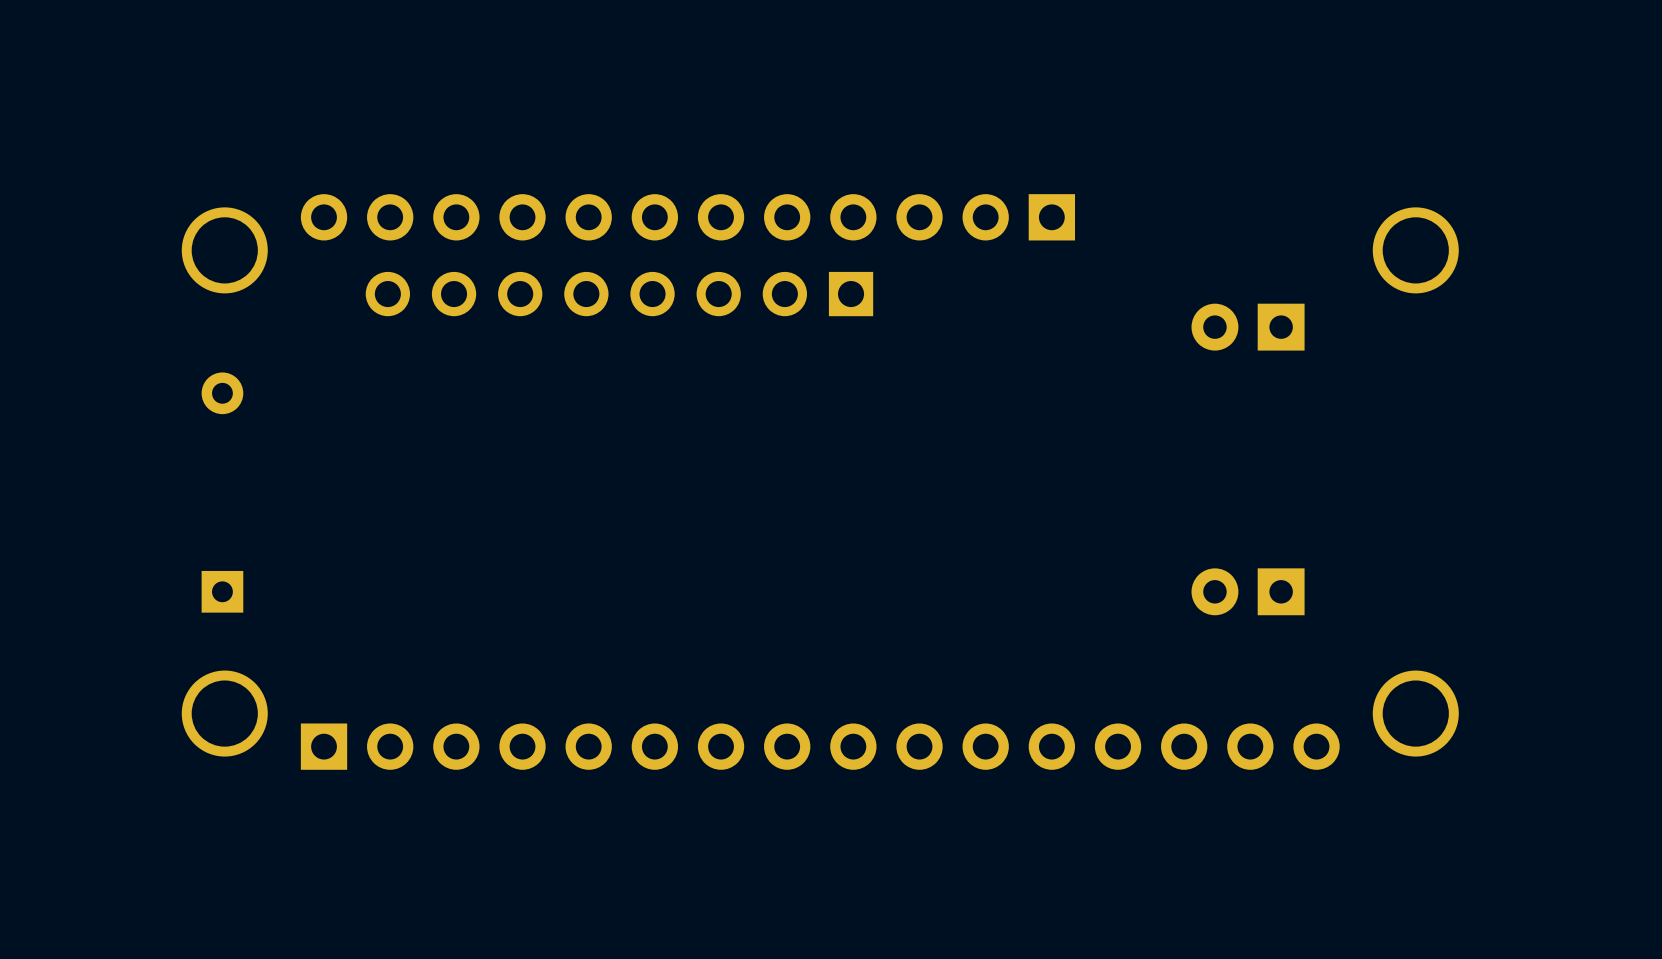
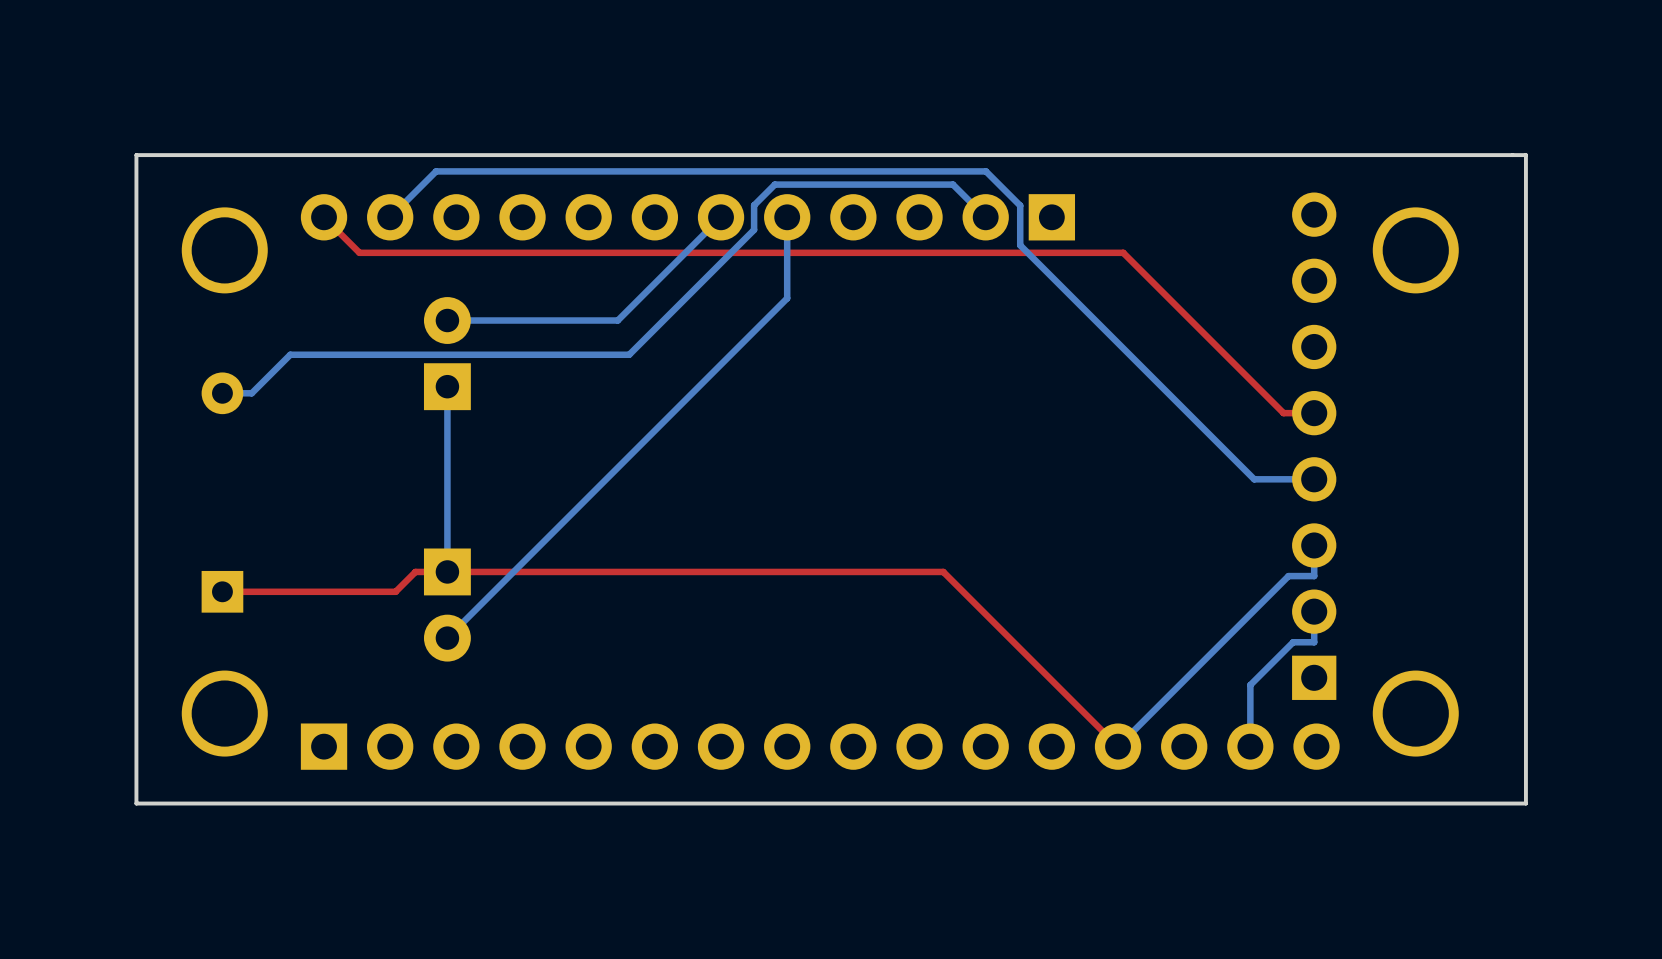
board edge: none -> (1525, 155) (136, 155) (136, 803) (1525, 803) (1525, 155)
top track: none -> (324, 217) (359, 252) (1123, 252) (1283, 413) (1314, 413)
bottom track: none -> (390, 217) (436, 171) (985, 171) (1020, 205) (1020, 245) (1254, 479) (1314, 479)
bottom track: none -> (721, 217) (617, 320) (447, 320)
bottom track: none -> (787, 217) (787, 298) (447, 638)
bottom track: none -> (985, 217) (952, 184) (774, 184) (754, 205) (754, 229) (629, 354) (290, 354) (251, 393) (222, 393)
part: (619, 294) -> none
part: (1248, 327) -> none
part: none -> (447, 353)
bottom track: none -> (447, 386) (447, 571)
part: none -> (1314, 446)
bottom track: none -> (1314, 545) (1314, 576) (1288, 576) (1118, 746)
top track: none -> (222, 591) (395, 591) (415, 571) (943, 571) (1118, 746)
part: (1248, 591) -> none
part: none -> (447, 605)
bottom track: none -> (1314, 611) (1314, 642) (1293, 642) (1250, 685) (1250, 746)

